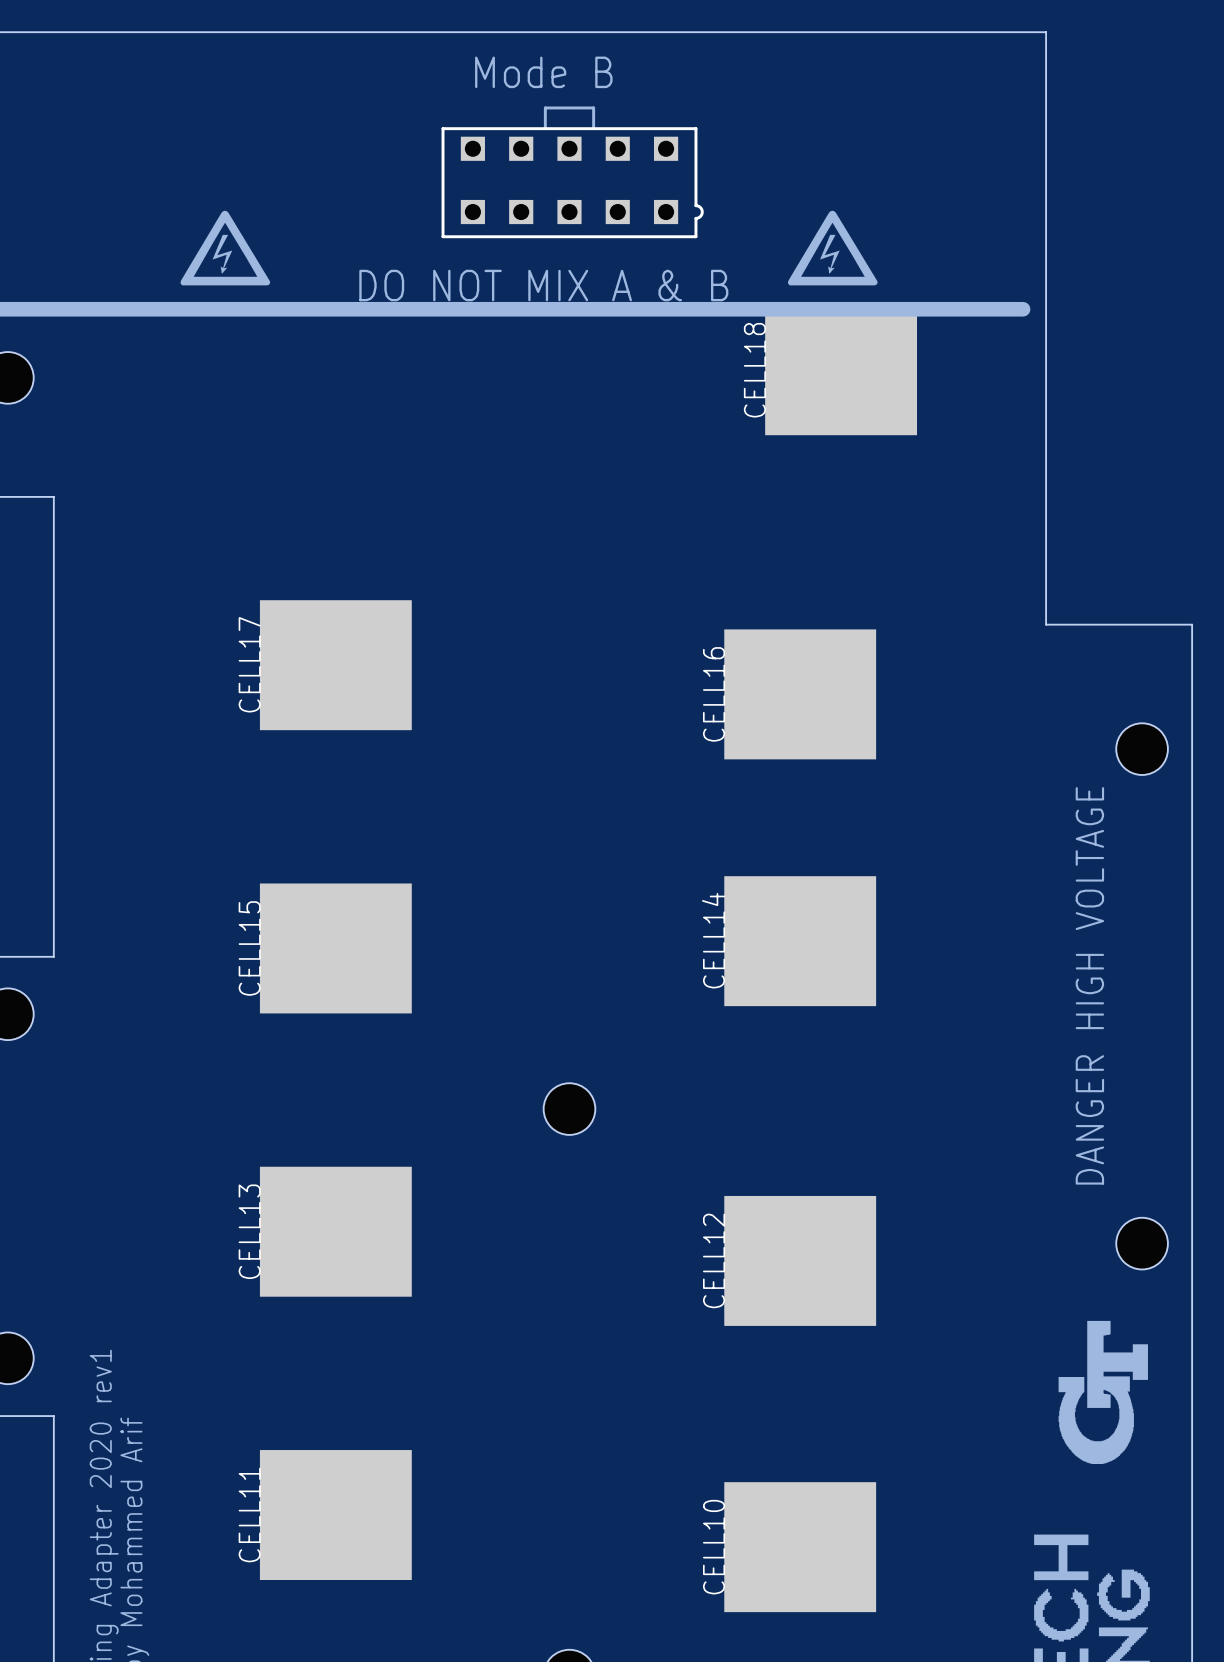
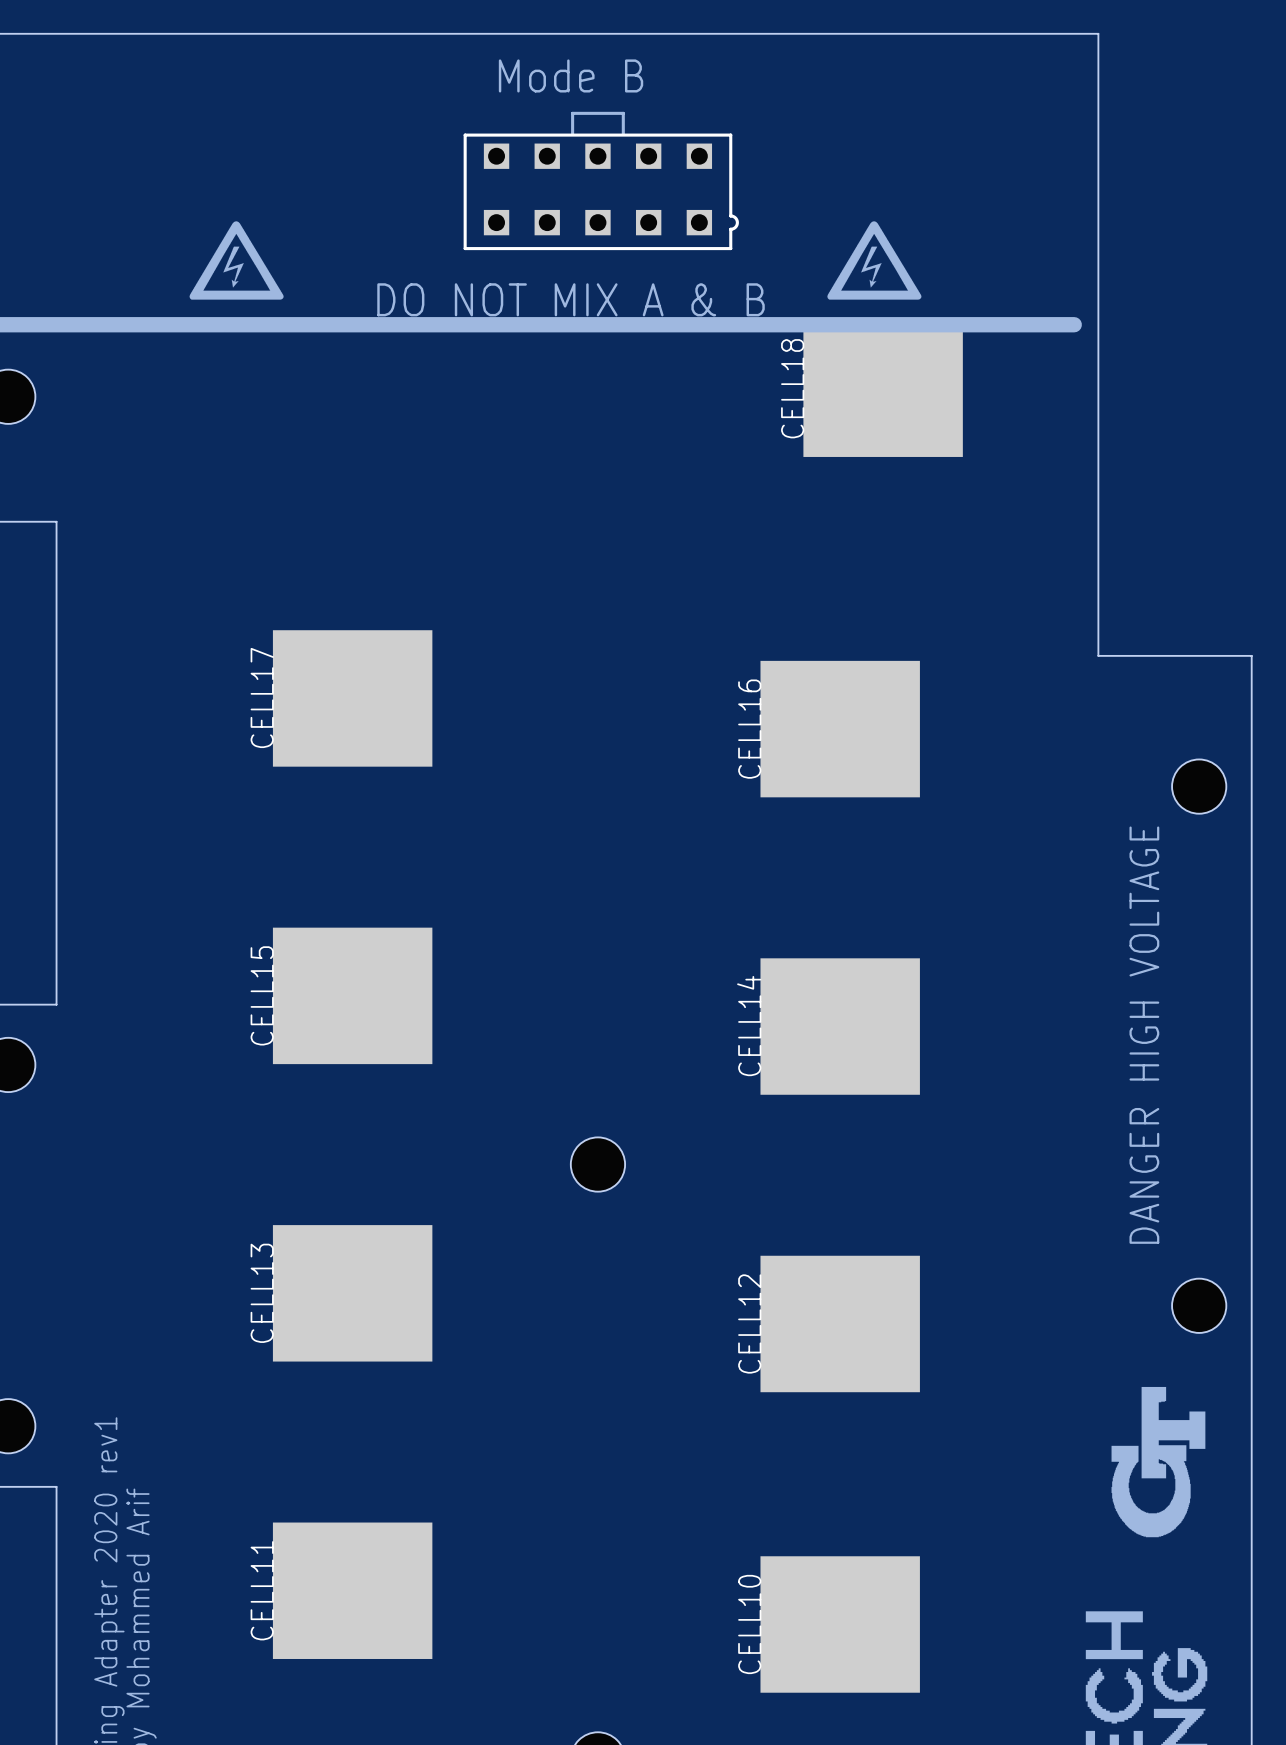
CELL14 position: (800, 941) -> (840, 1026)

